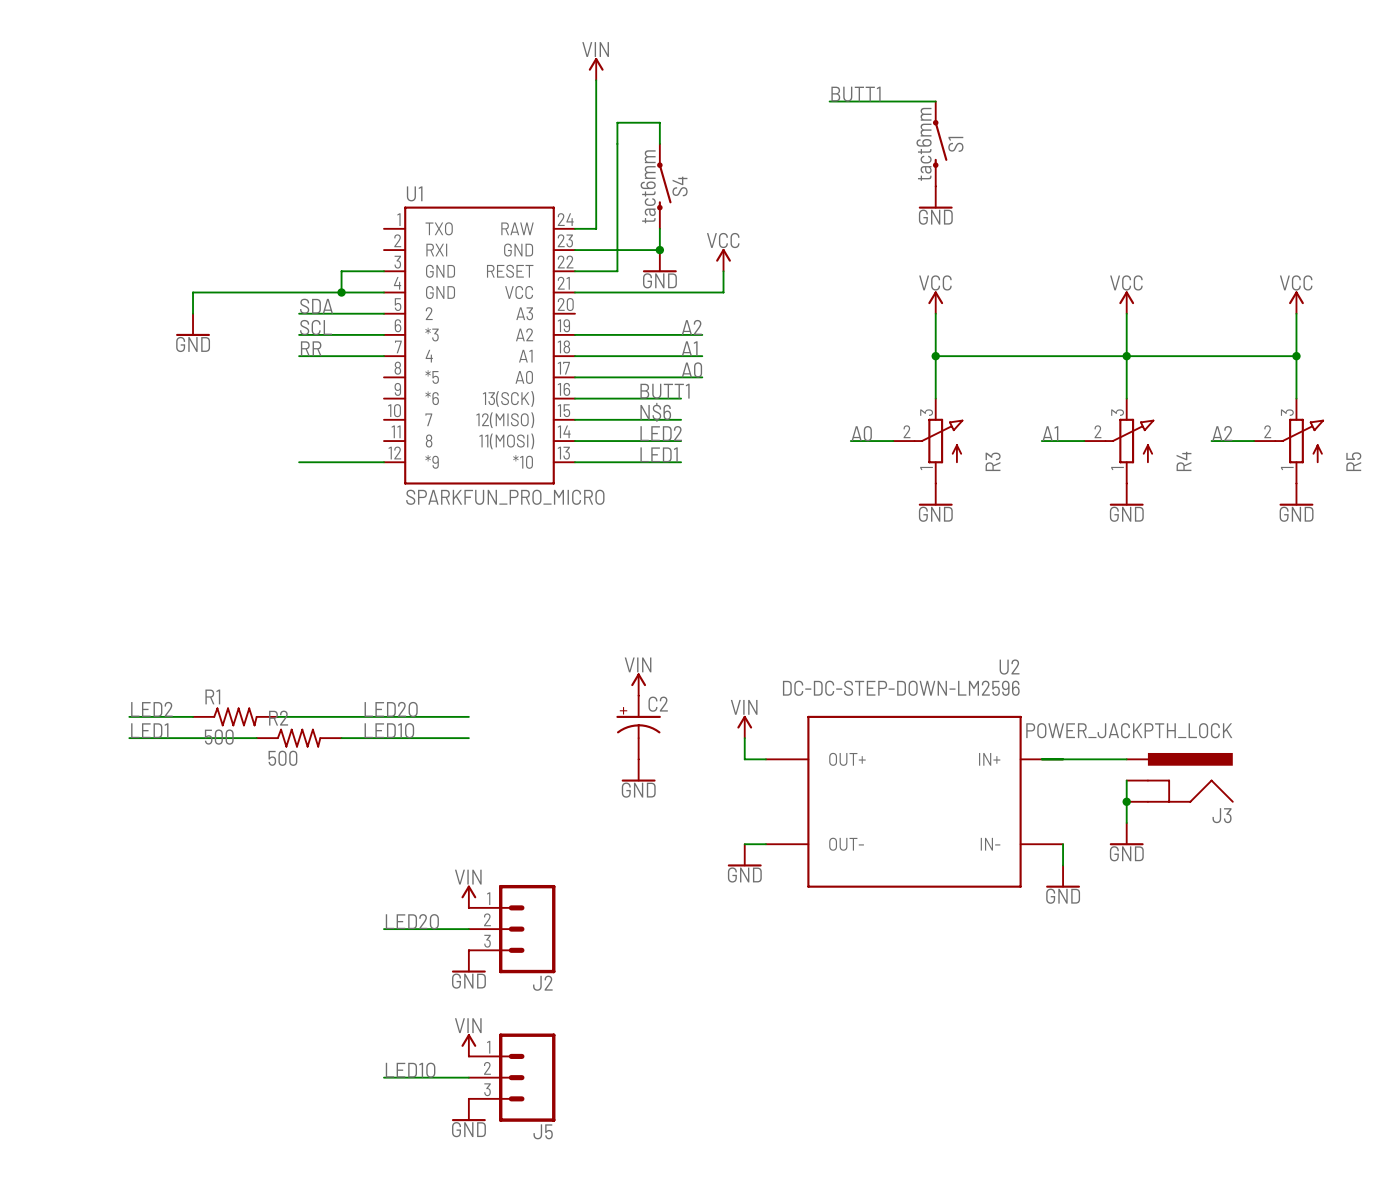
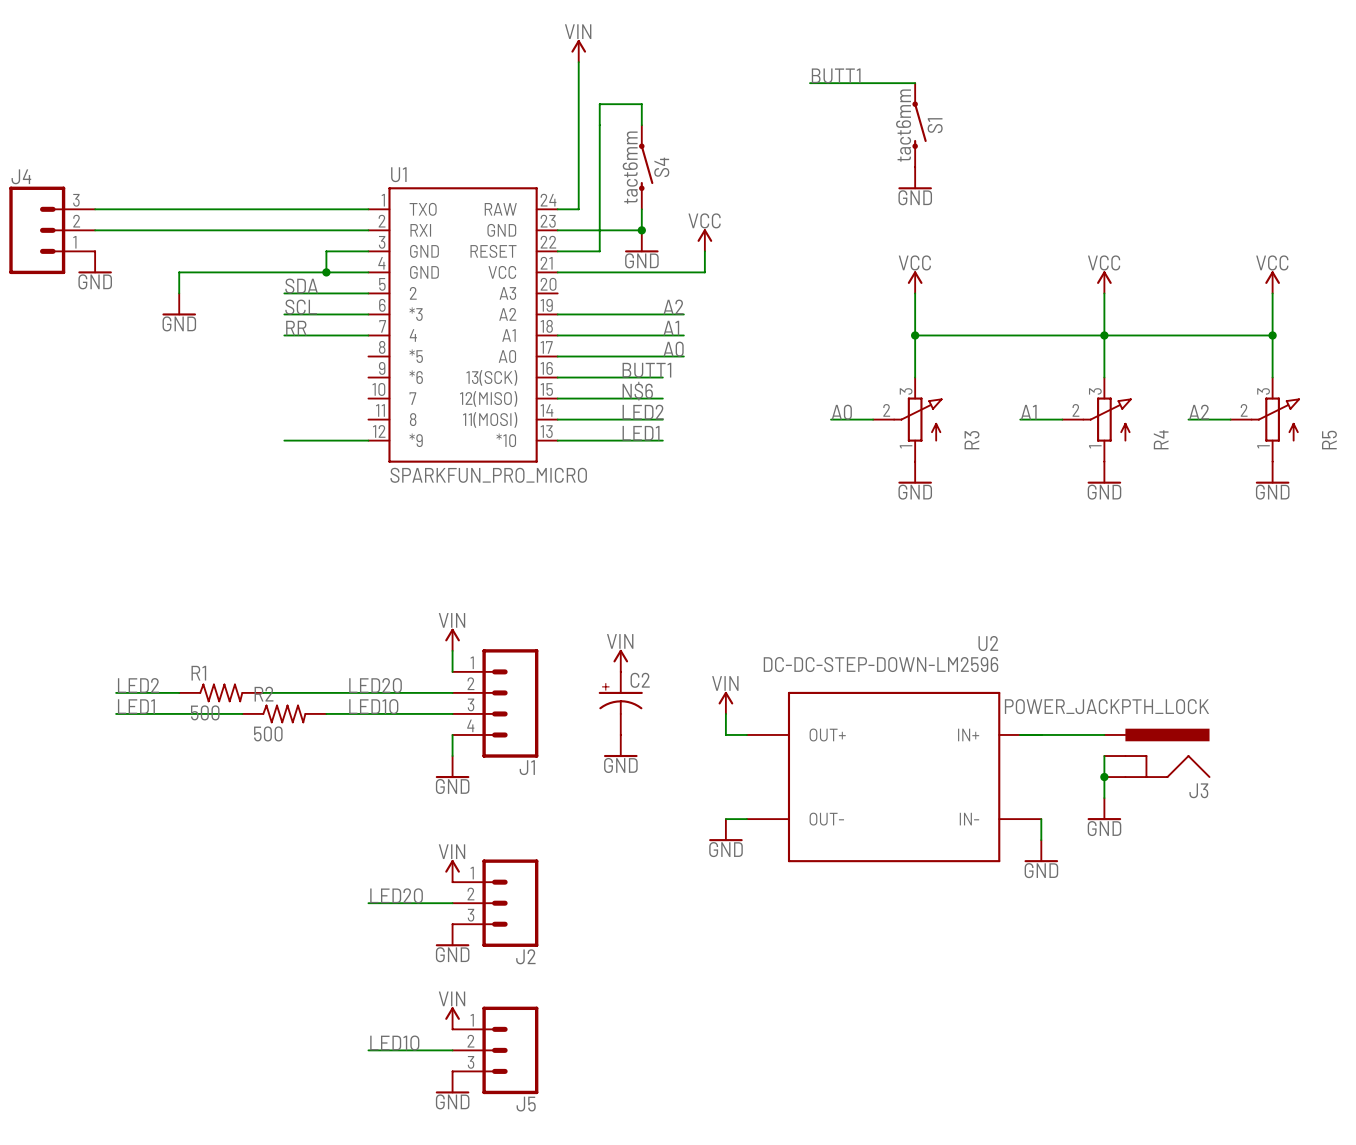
wire: none -> (95, 209) (368, 209)
J4: none -> (52, 230)
wire: none -> (95, 230) (368, 230)
power symbol: none -> GND (95, 262)
power symbol: none -> VIN (452, 639)
wire: none -> (452, 650) (452, 671)
J1: none -> (495, 703)
wire: none -> (452, 734) (452, 756)
power symbol: none -> GND (452, 767)

